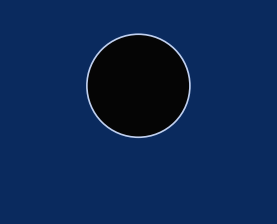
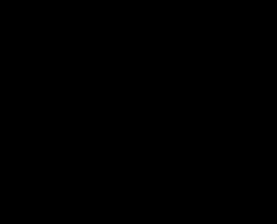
part: (138, 85) -> none

